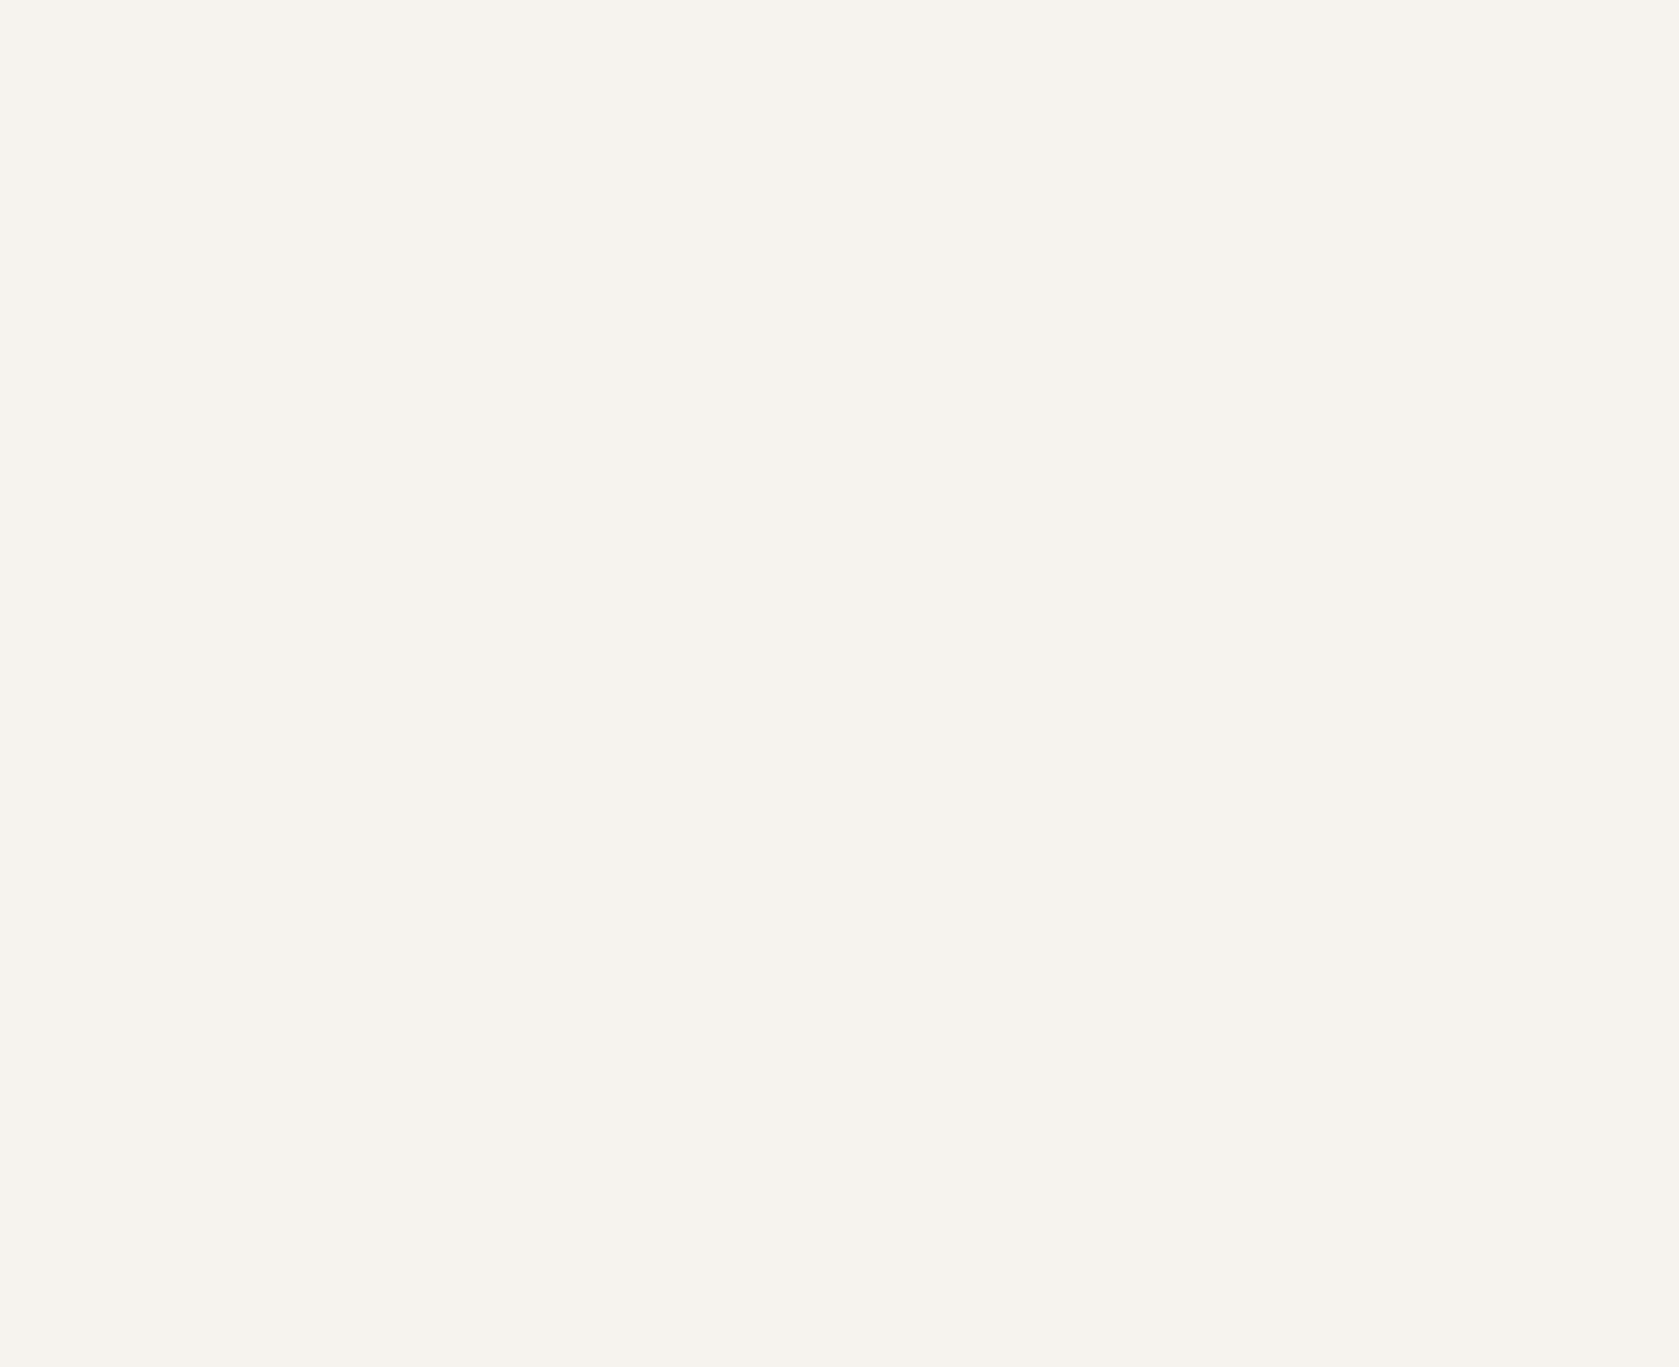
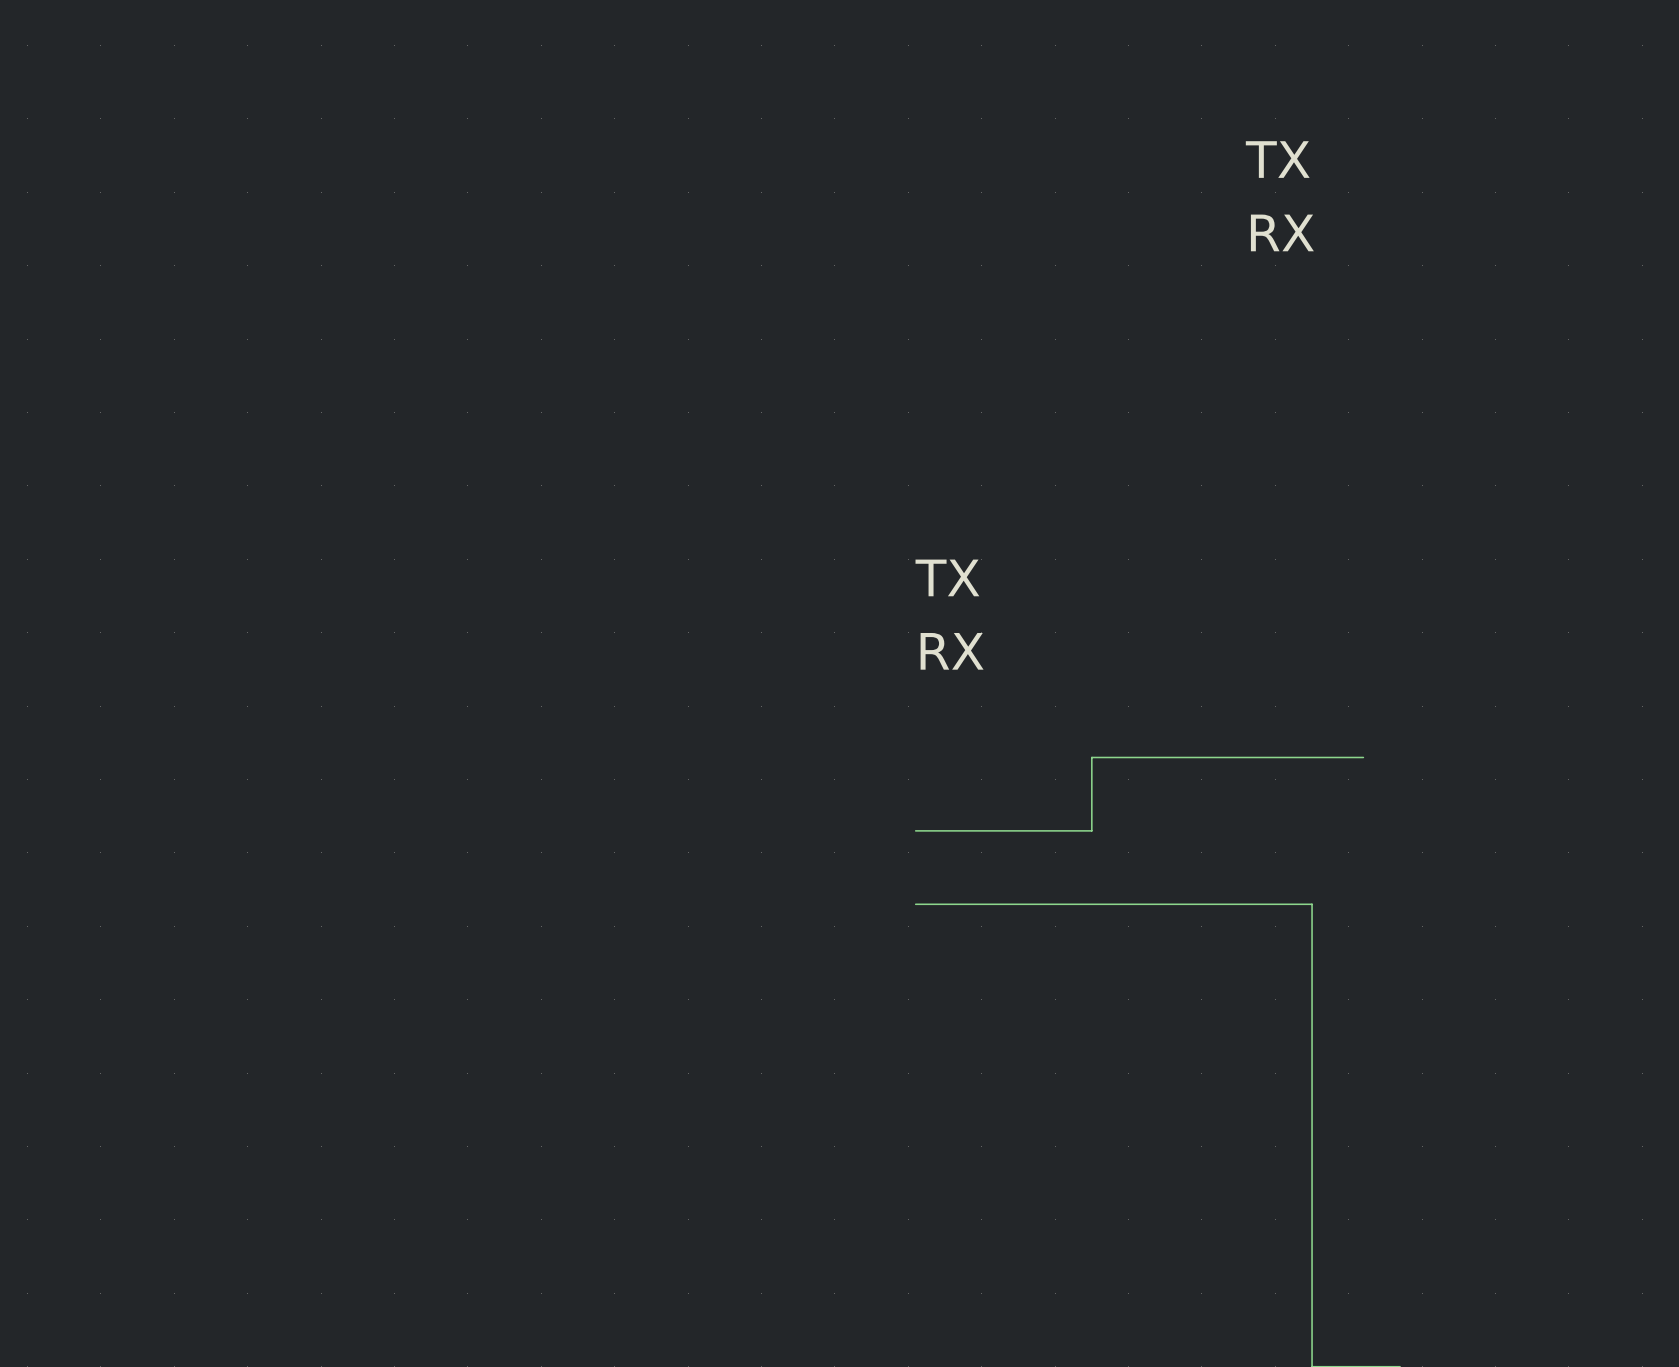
label: none -> TX (1277, 159)
label: none -> RX (1282, 232)
label: none -> TX (947, 577)
label: none -> RX (952, 651)
wire: none -> (1363, 757) (1091, 757) (1091, 830) (915, 830)
wire: none -> (915, 904) (1312, 904) (1312, 1366) (1400, 1366)

